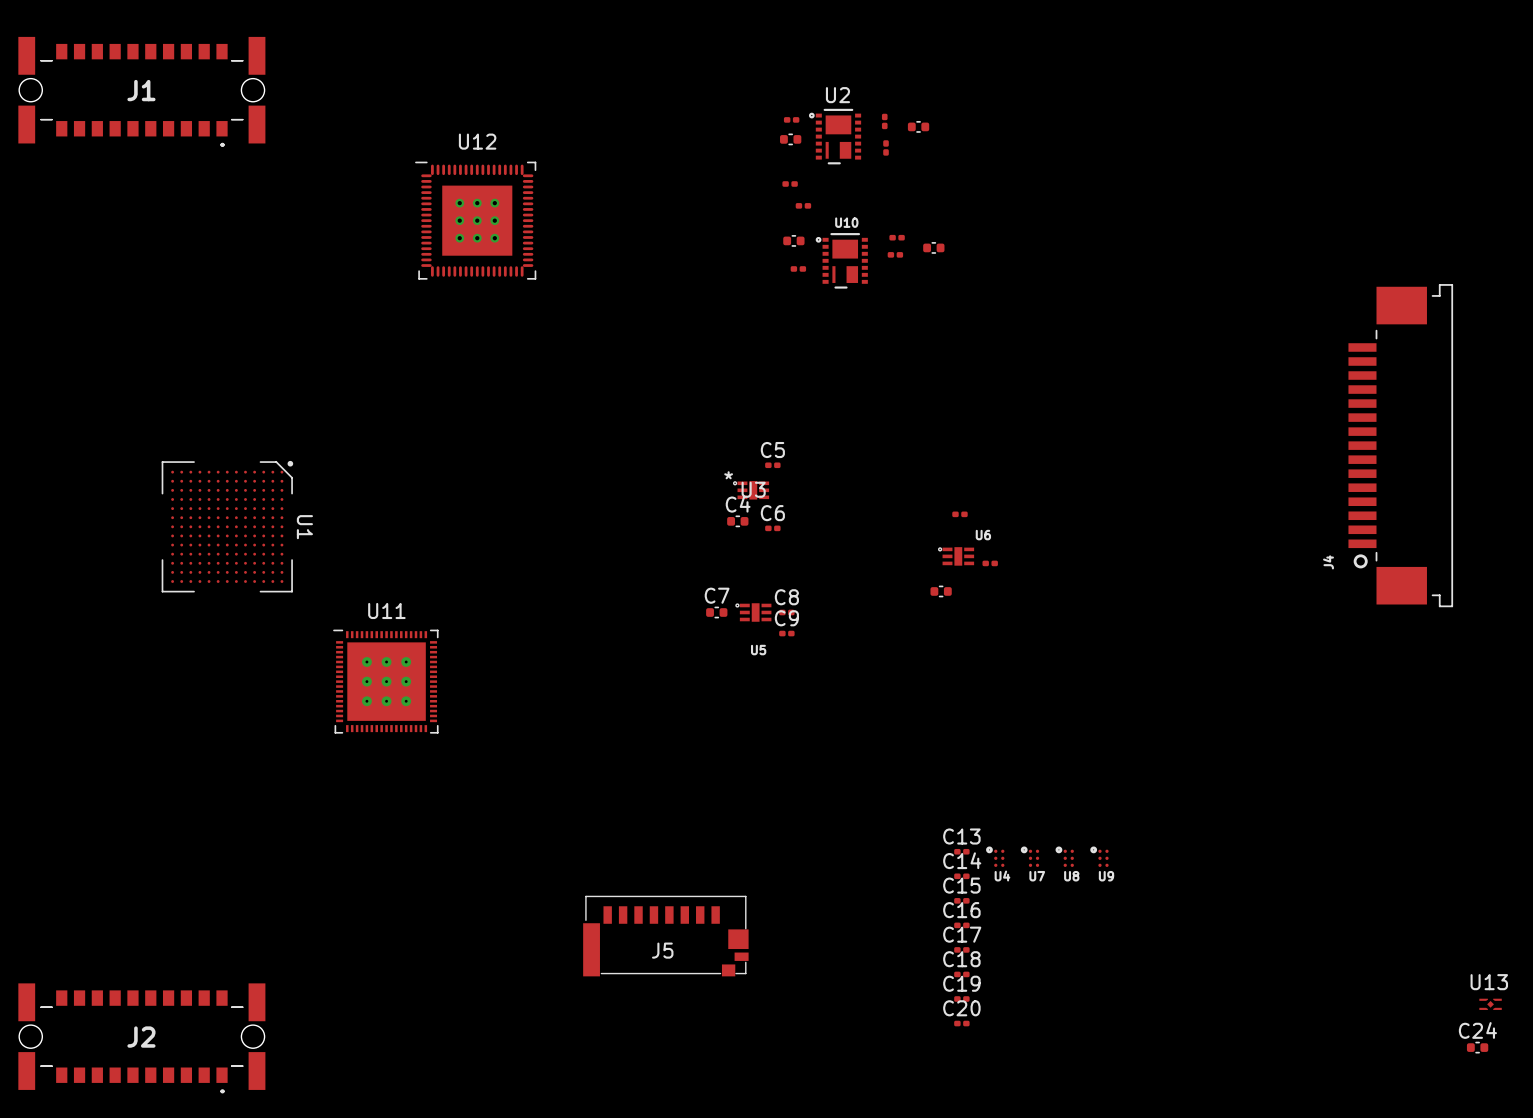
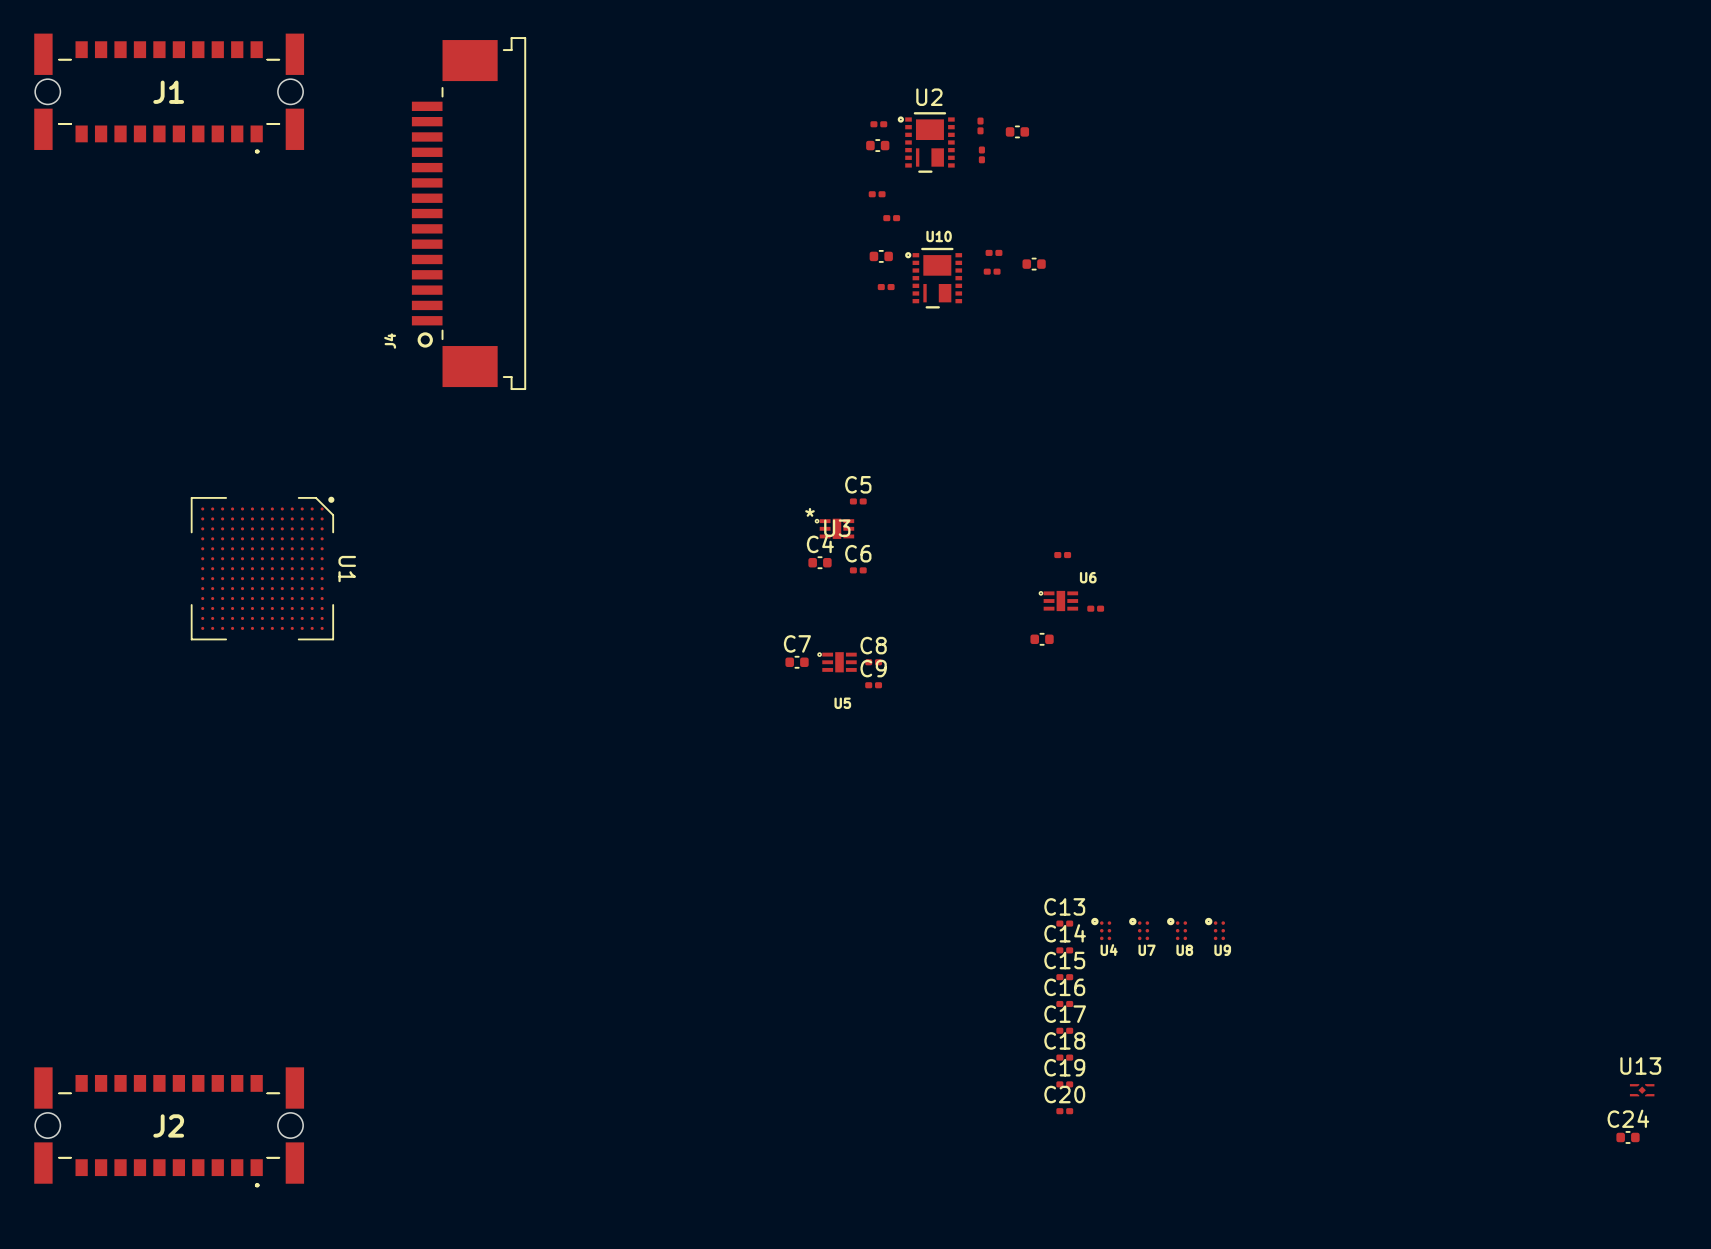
U12: (475, 220) -> none
J4 position: (1400, 445) -> (469, 213)
U11: (385, 681) -> none
J5: (665, 936) -> none

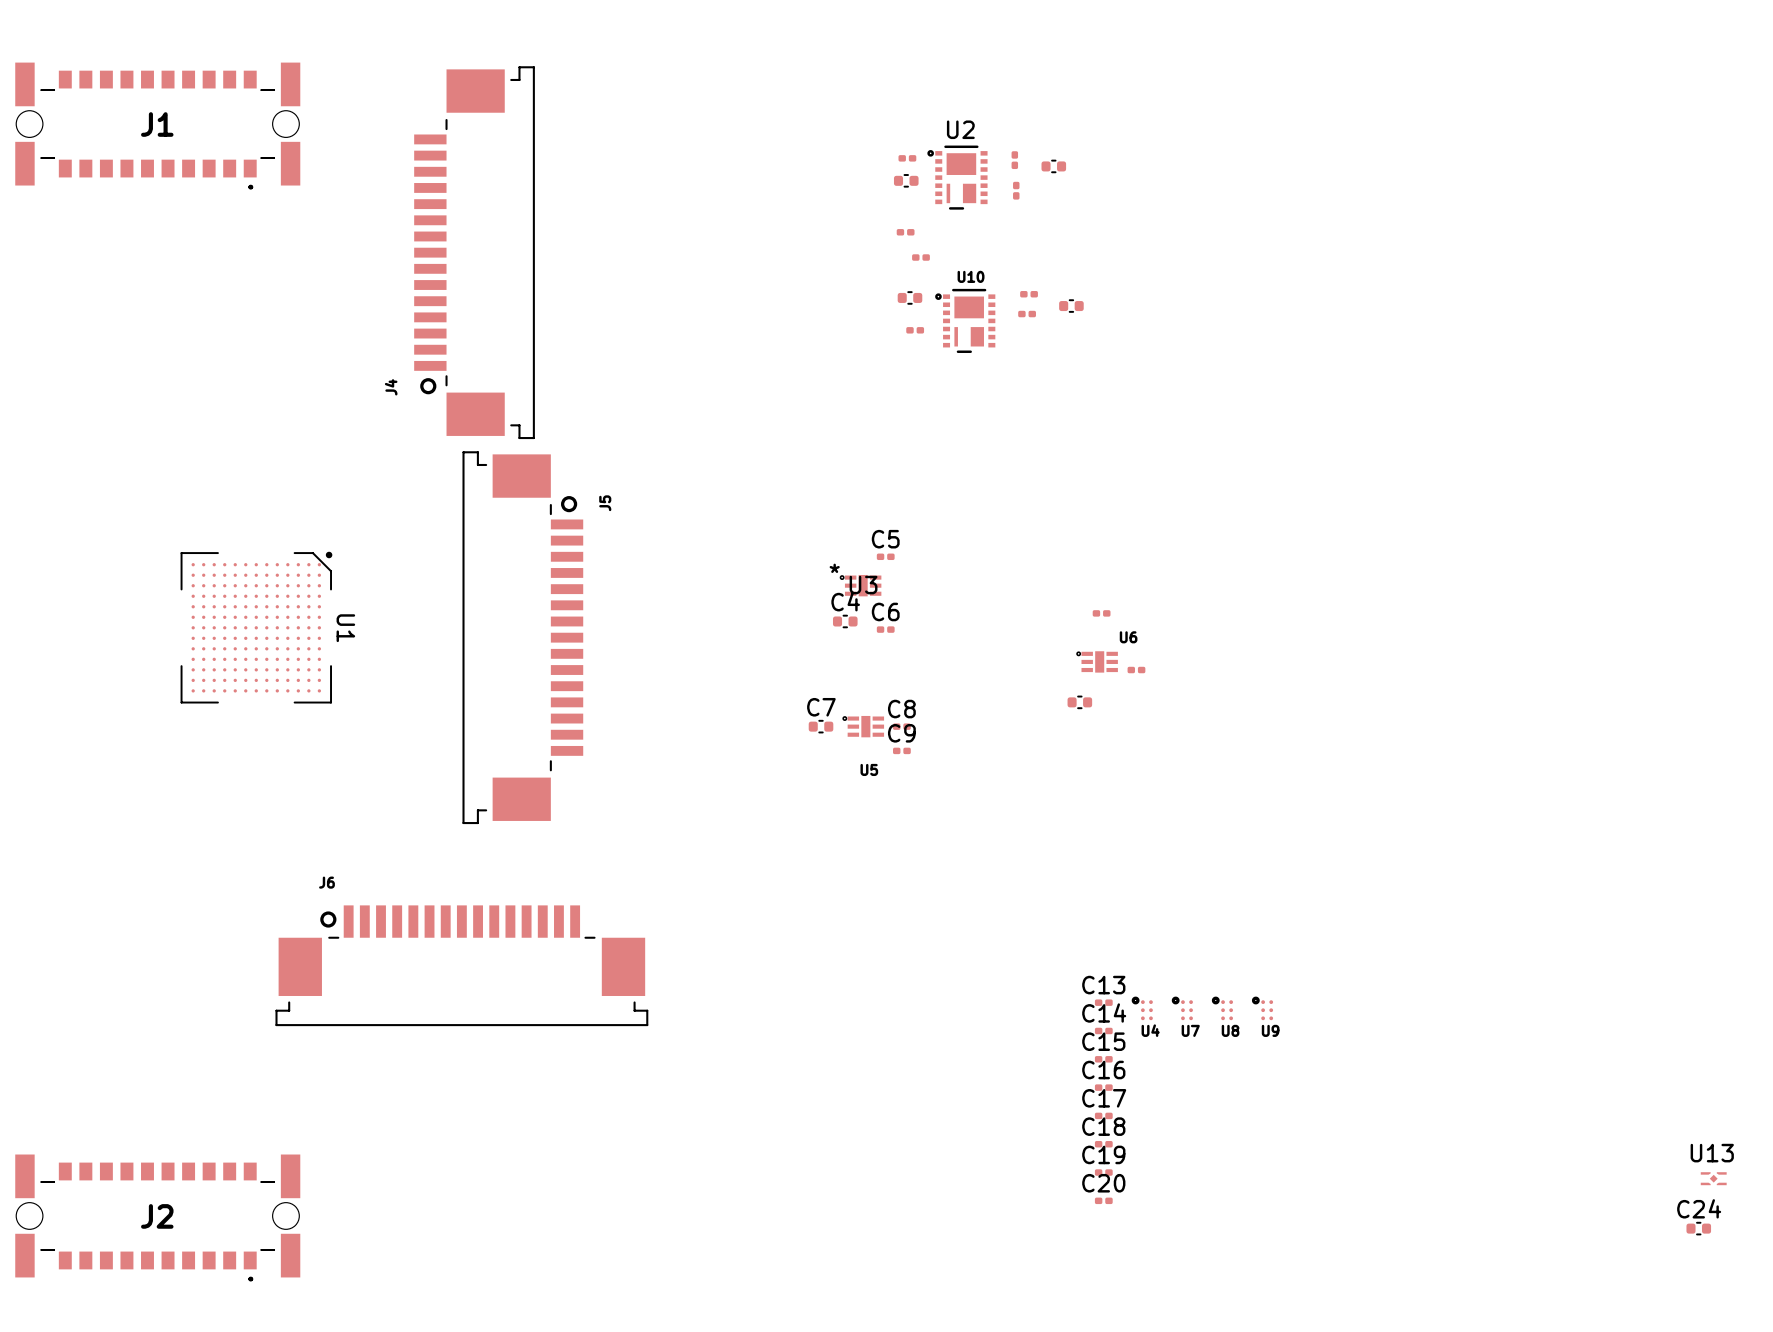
J5: none -> (522, 637)
J6: none -> (461, 965)

